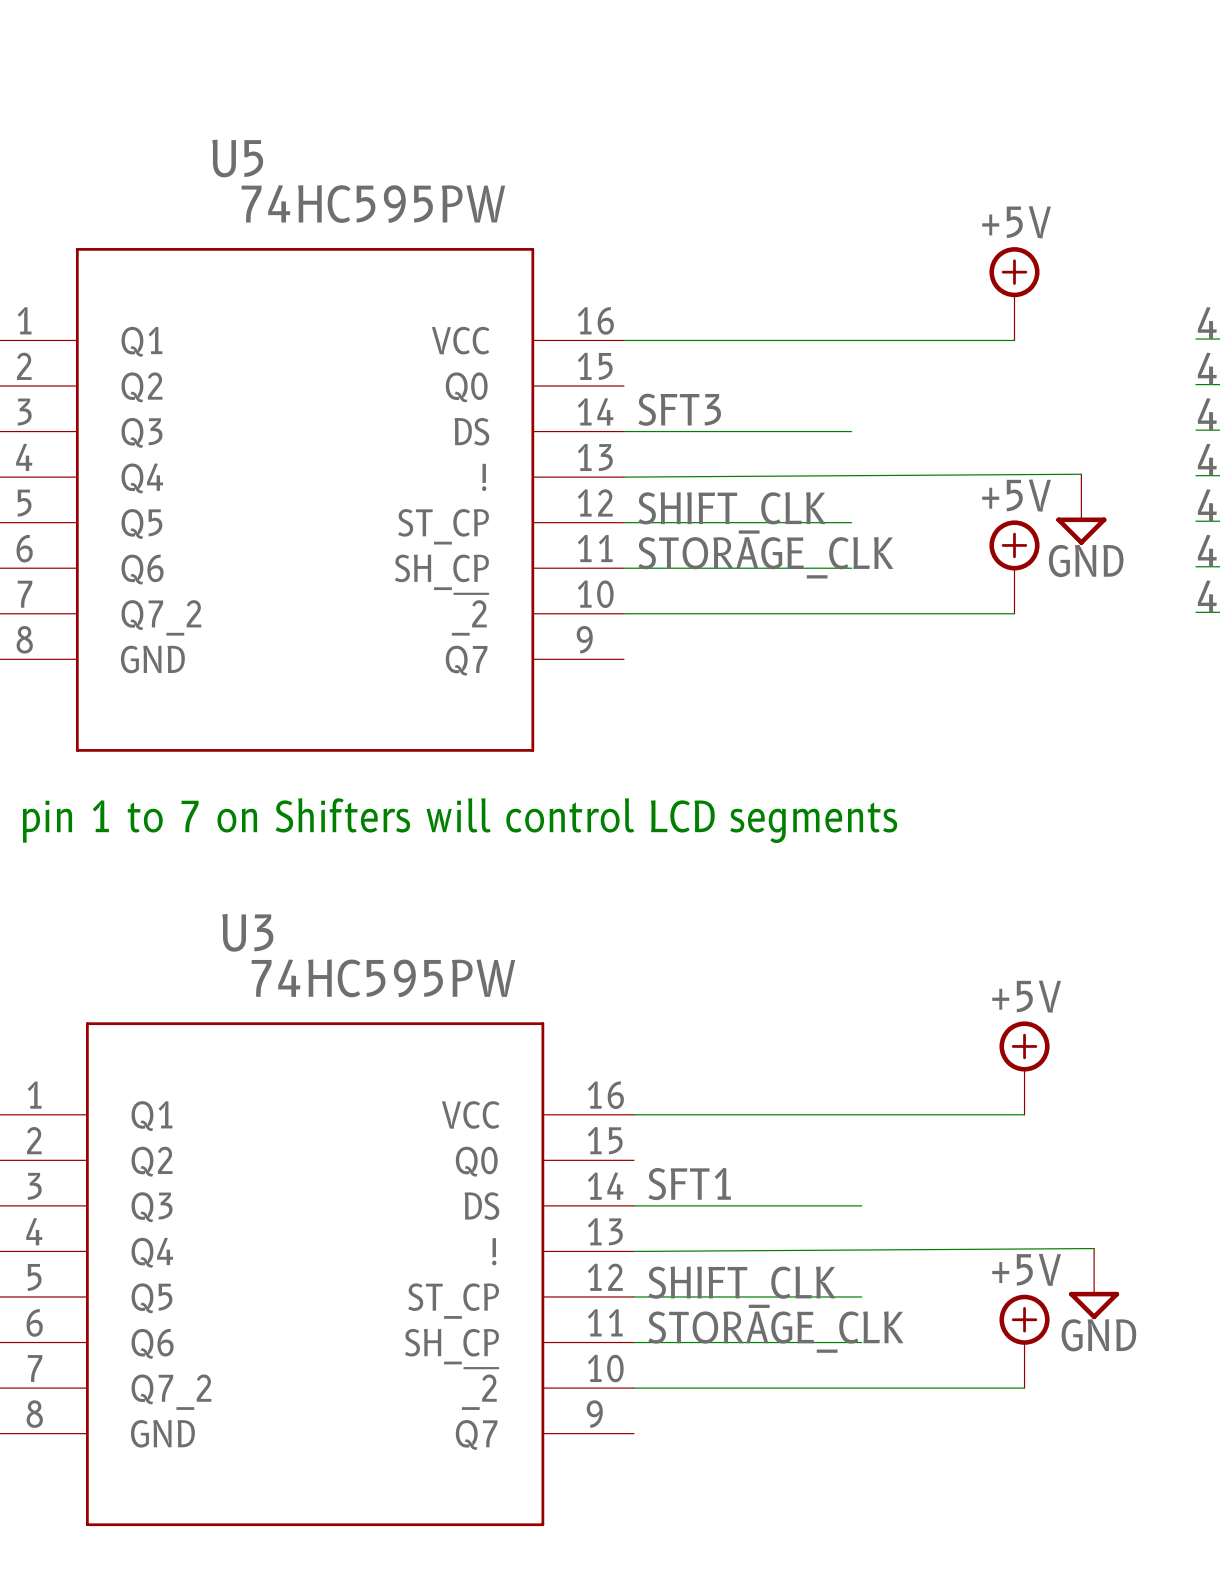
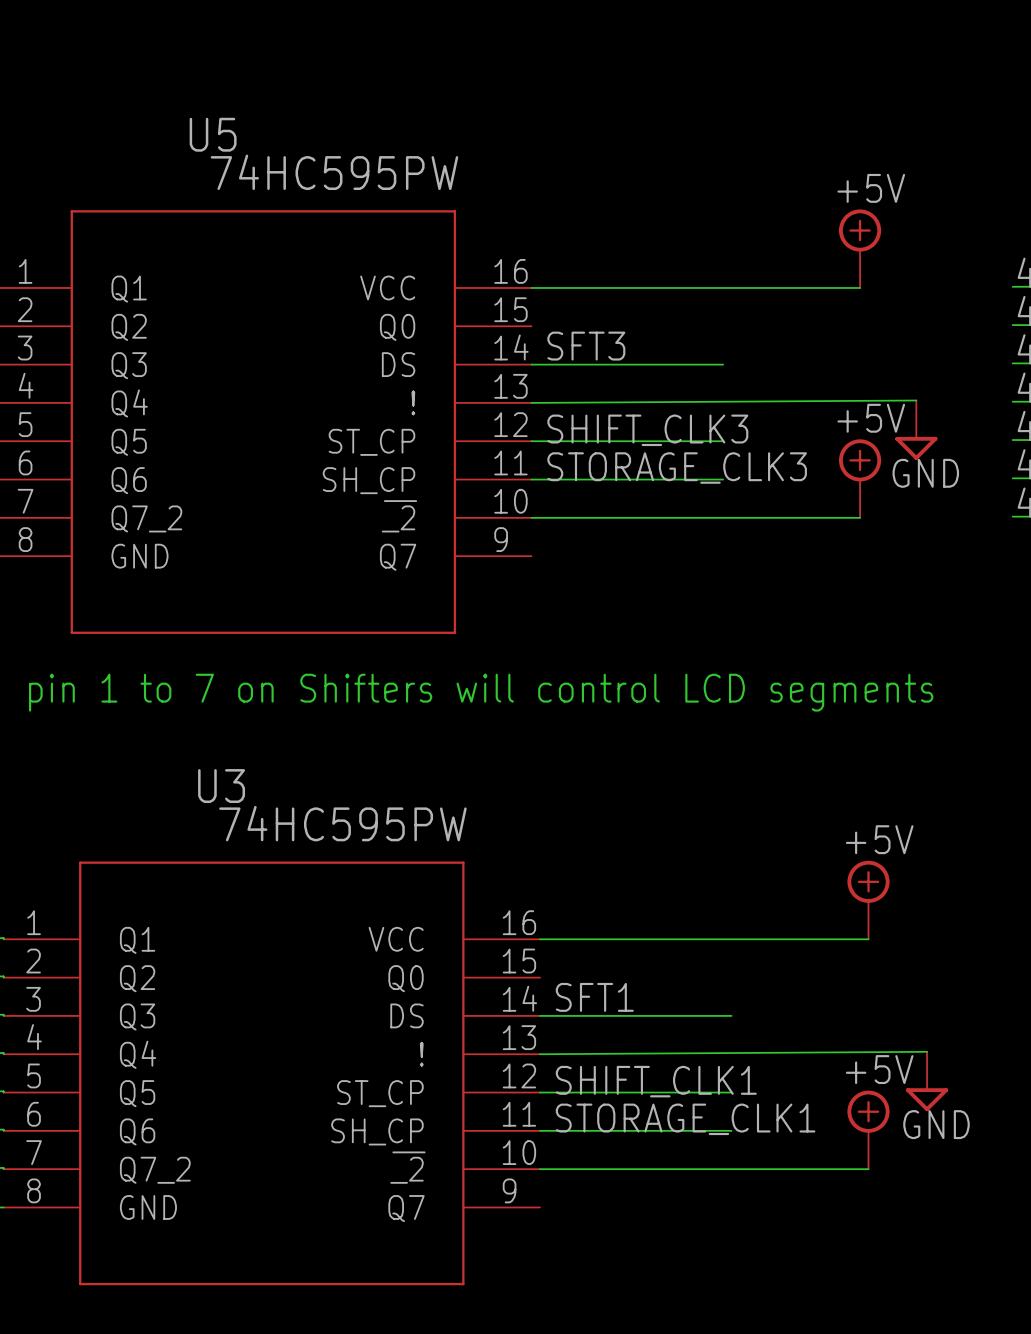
label: SHIFT_CLK (731, 512) -> SHIFT_CLK3 (647, 430)
label: STORAGE_CLK (765, 557) -> STORAGE_CLK3 (677, 468)
label: SHIFT_CLK (741, 1287) -> SHIFT_CLK1 (656, 1081)
label: STORAGE_CLK (775, 1332) -> STORAGE_CLK1 (685, 1119)

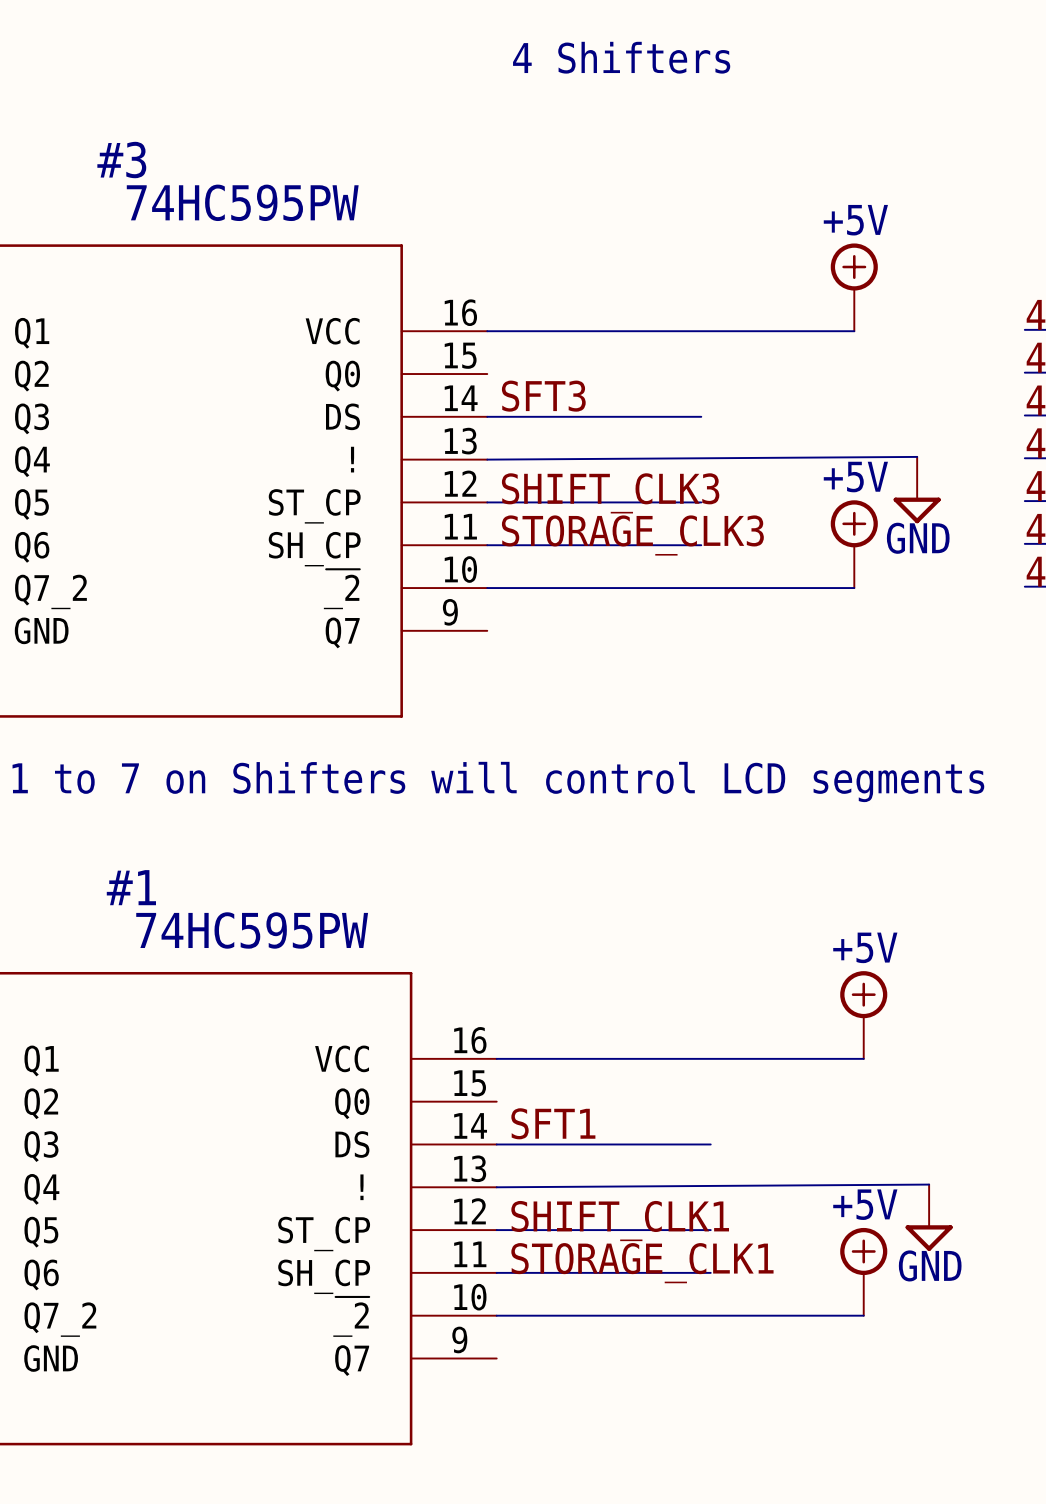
text: none -> 4 Shifters (621, 57)
U5 name: U5 (213, 134) -> #3 (121, 160)
U3 name: U3 (221, 786) -> #1 (131, 887)

